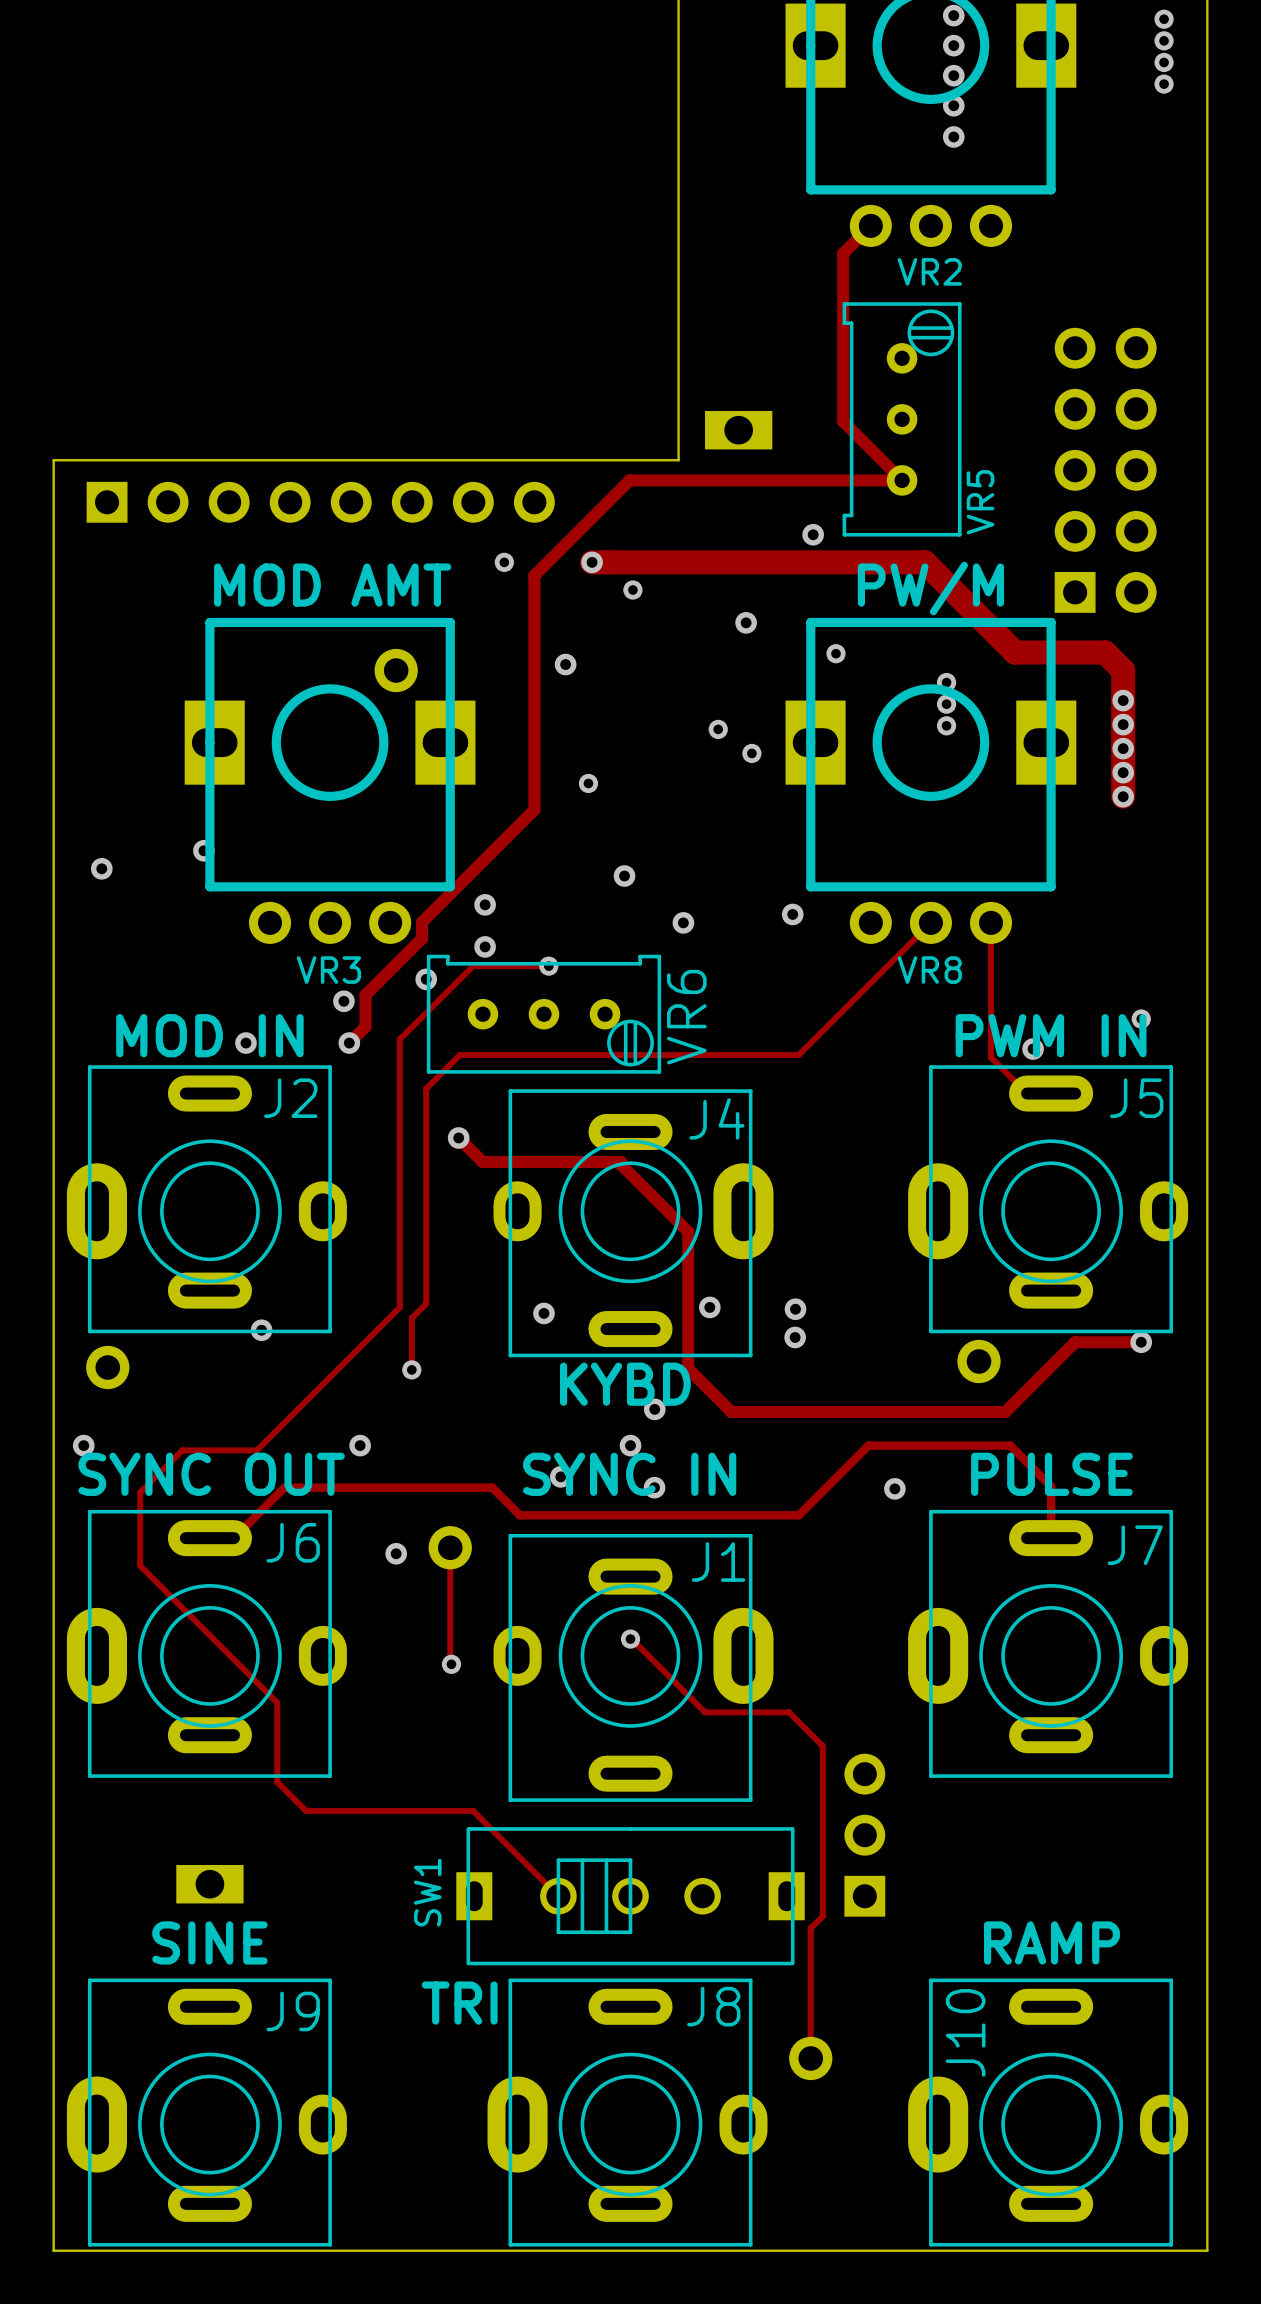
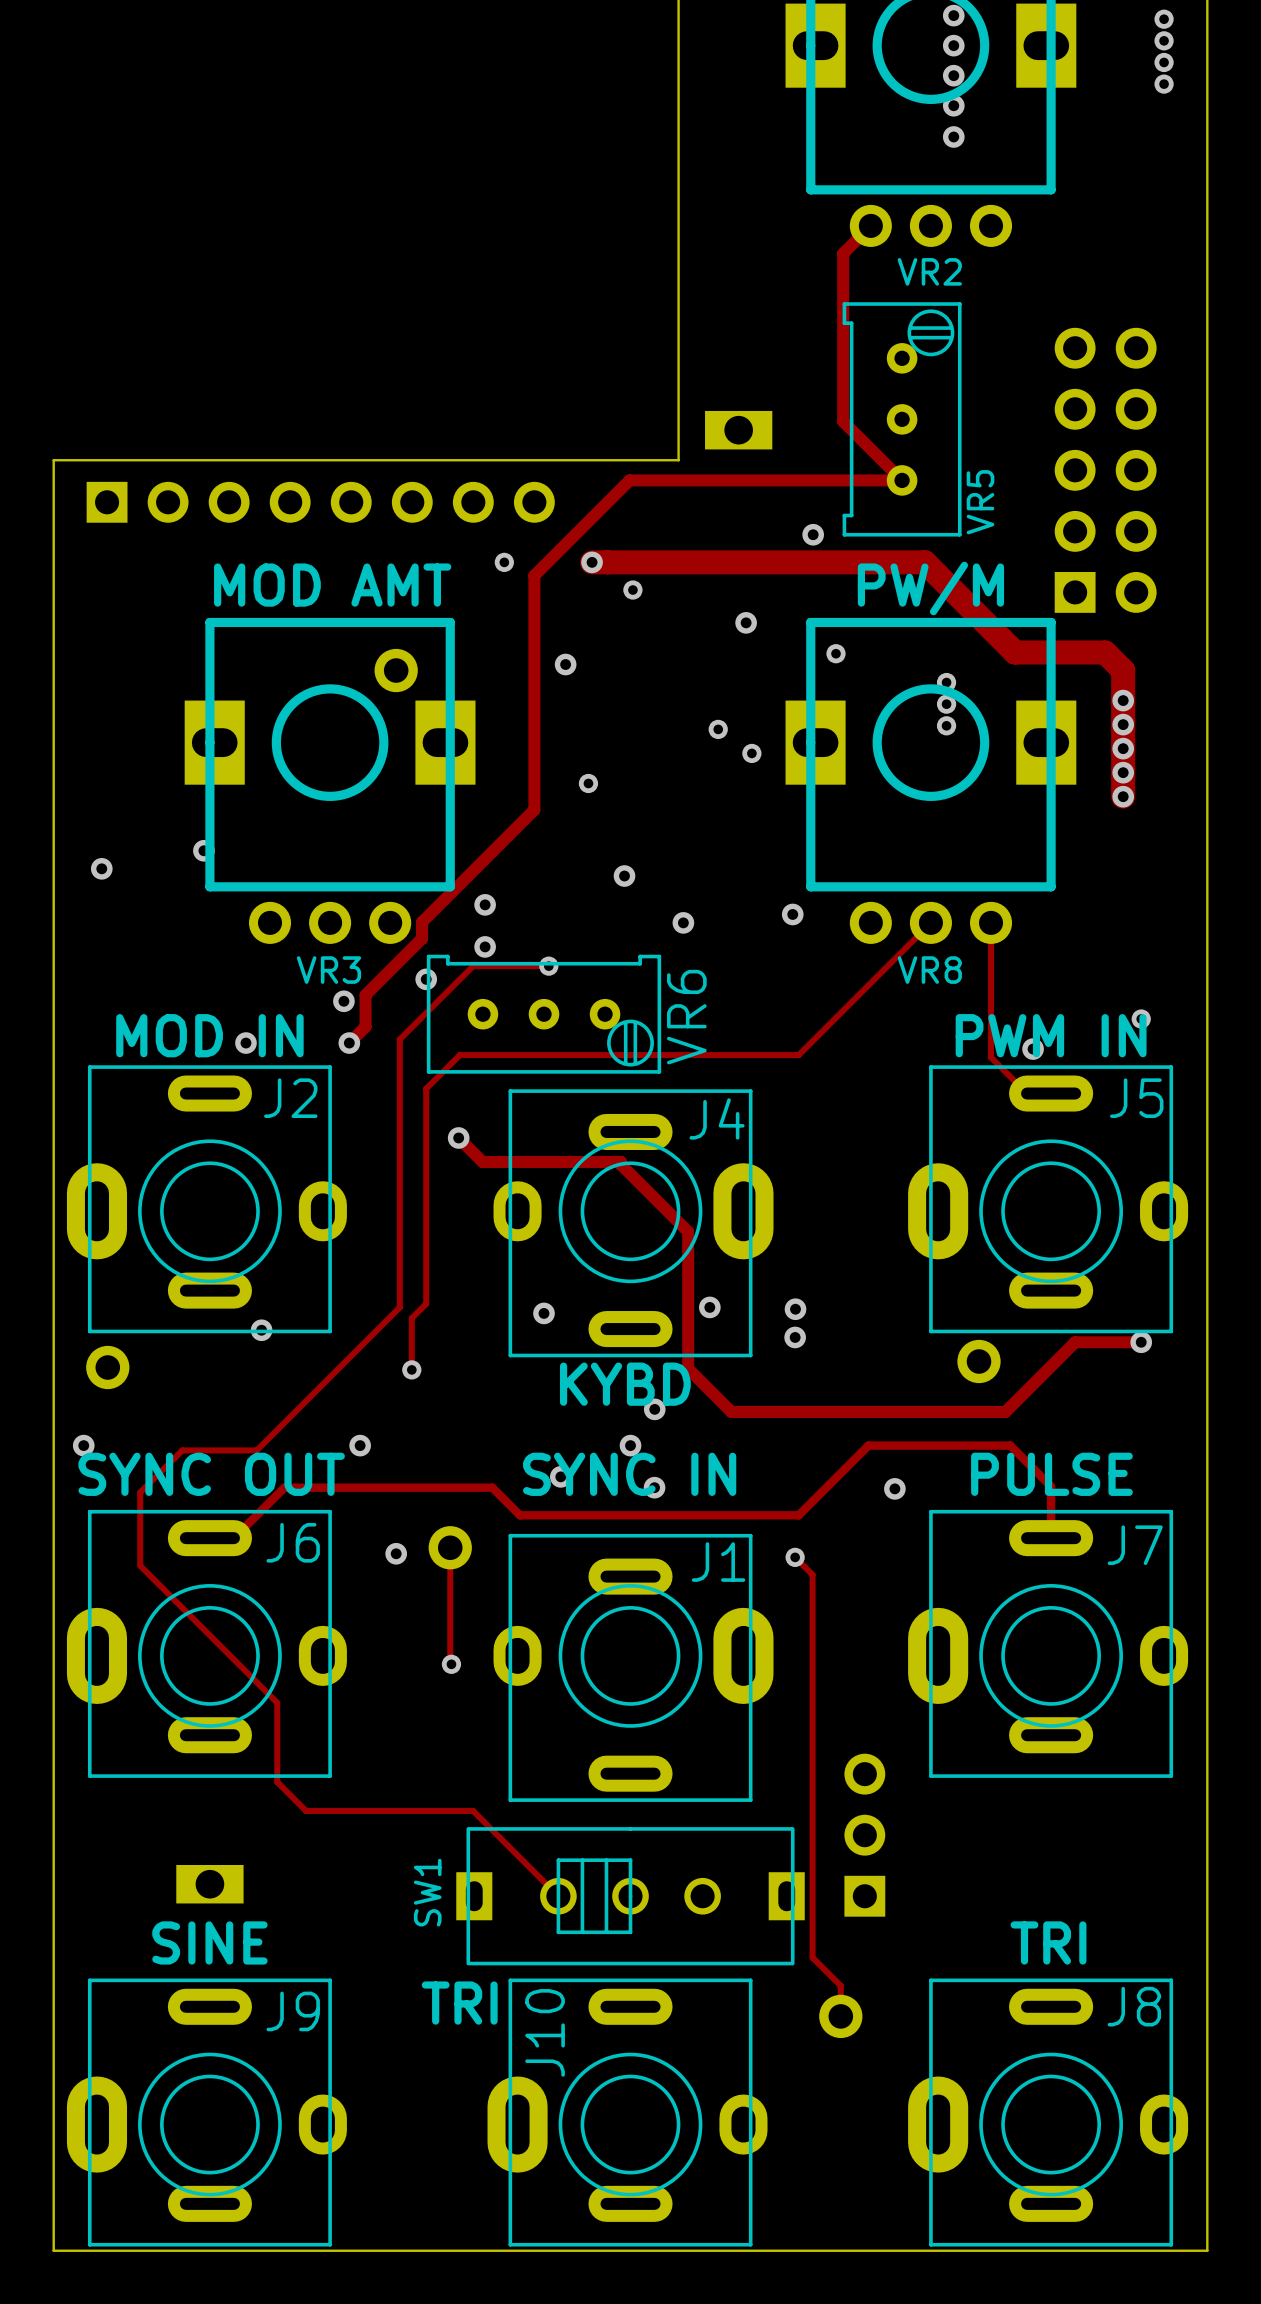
track: none -> (795, 1557) (812, 1574) (812, 1957) (840, 1985) (840, 2016)
via: none -> (795, 1557)
track: (630, 1639) (705, 1712) (789, 1712) (822, 1746) (822, 1916) (811, 1928) -> none
via: (630, 1639) -> none
track: (810, 1928) (810, 2058) -> none
text: RAMP (1051, 1942) -> TRI (1048, 1942)
J8 name: J8 (713, 2006) -> J10 (545, 2032)
J10 name: J10 (965, 2032) -> J8 (1134, 2006)
part position: (810, 2058) -> (840, 2016)

